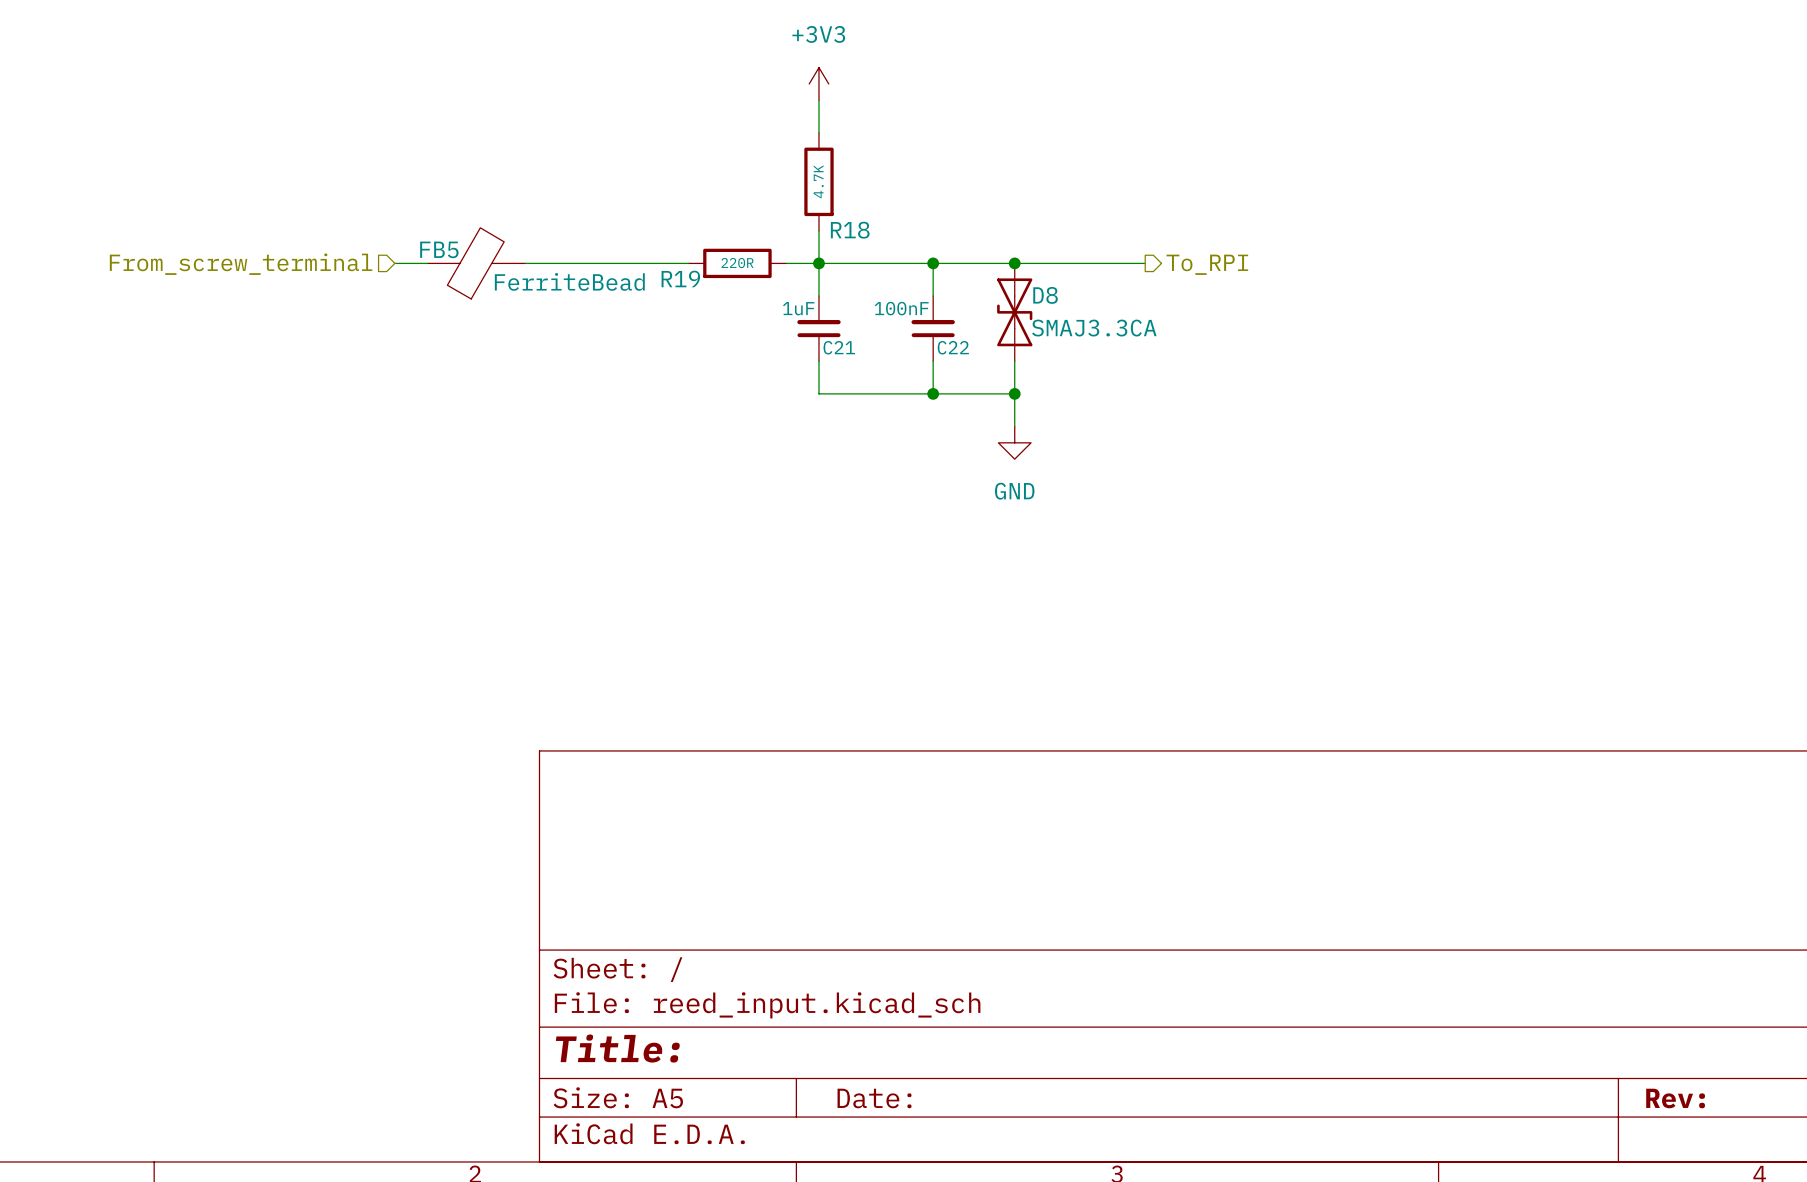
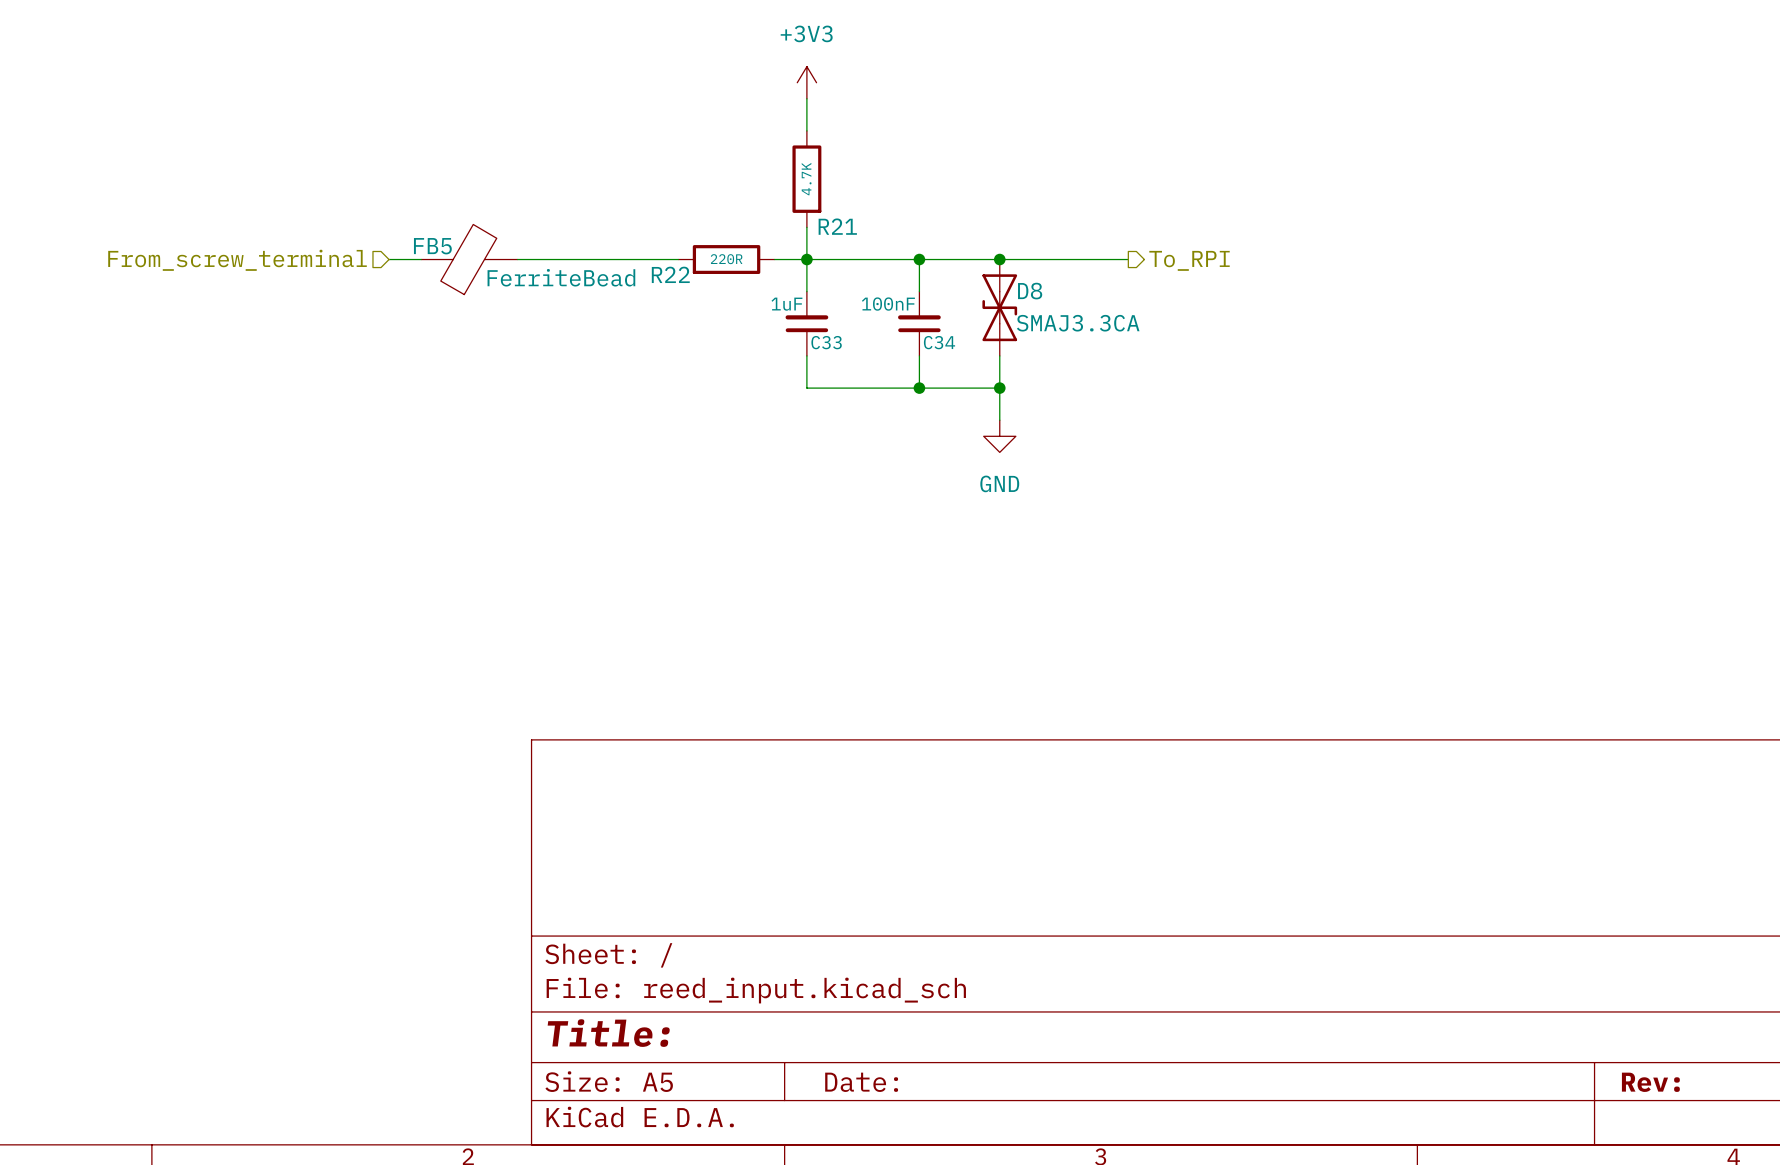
R18 name: R18 (850, 230) -> R21 (837, 226)
R19 name: R19 (680, 278) -> R22 (670, 274)
C21 name: C21 (839, 347) -> C33 (826, 342)
C22 name: C22 (953, 347) -> C34 (939, 342)

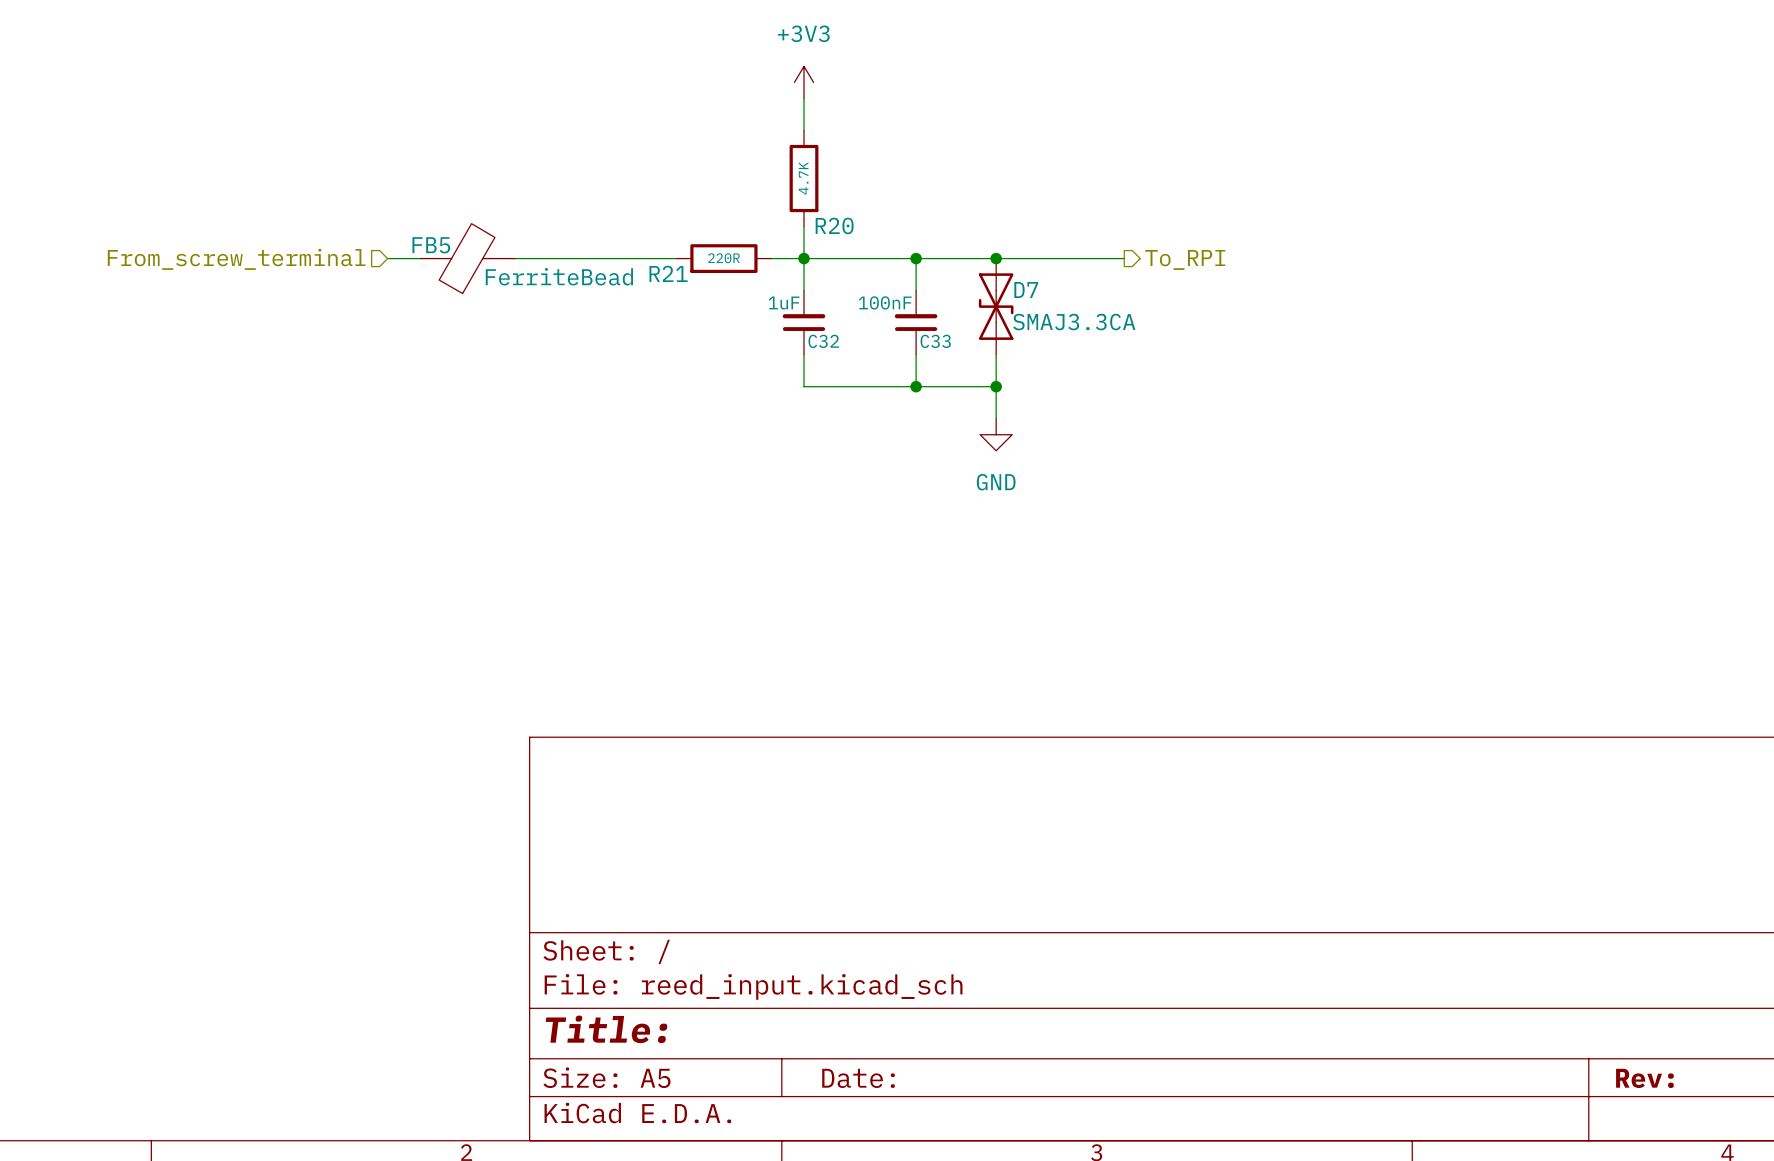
R21 name: R21 (837, 226) -> R20 (834, 225)
R22 name: R22 (670, 274) -> R21 (668, 273)
D8 name: D8 (1030, 291) -> D7 (1026, 290)
C33 name: C33 (826, 342) -> C32 (823, 341)
C34 name: C34 (939, 342) -> C33 (935, 341)

